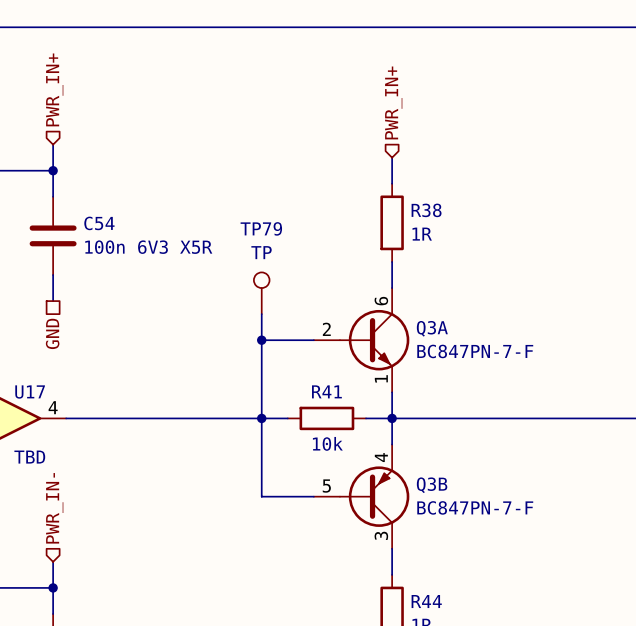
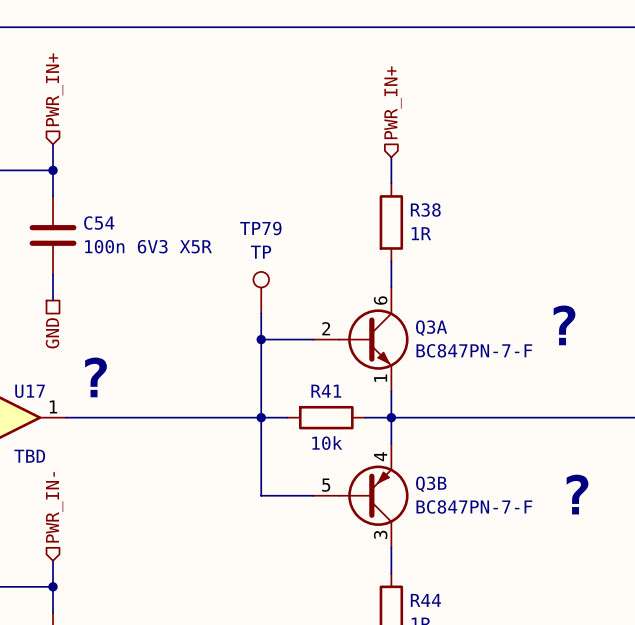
text: none -> ? (564, 325)
text: none -> ? (96, 377)
U17 pin number: 4 (53, 407) -> 1 (53, 406)
text: none -> ? (577, 494)

